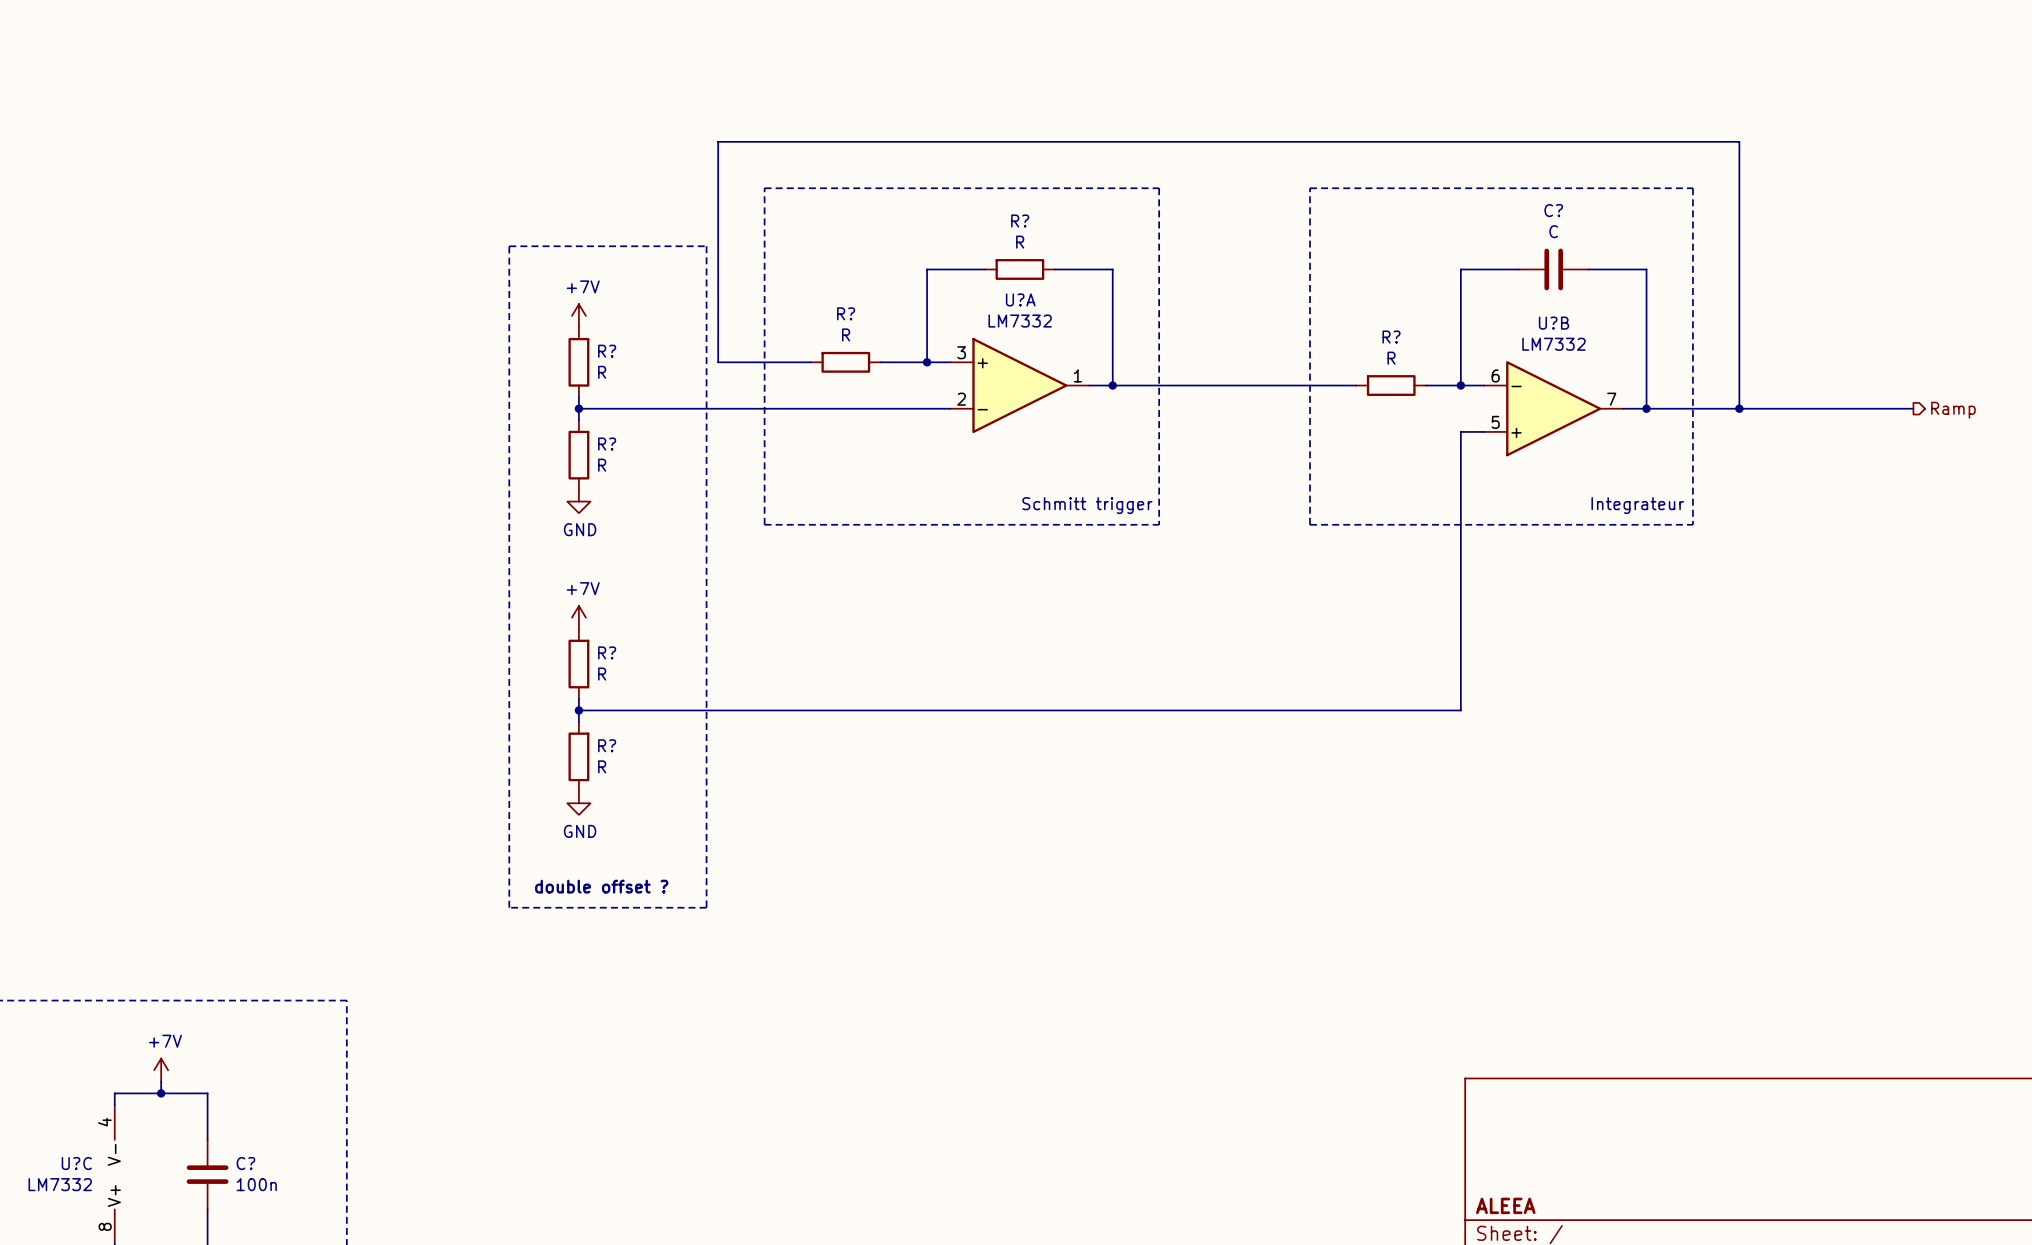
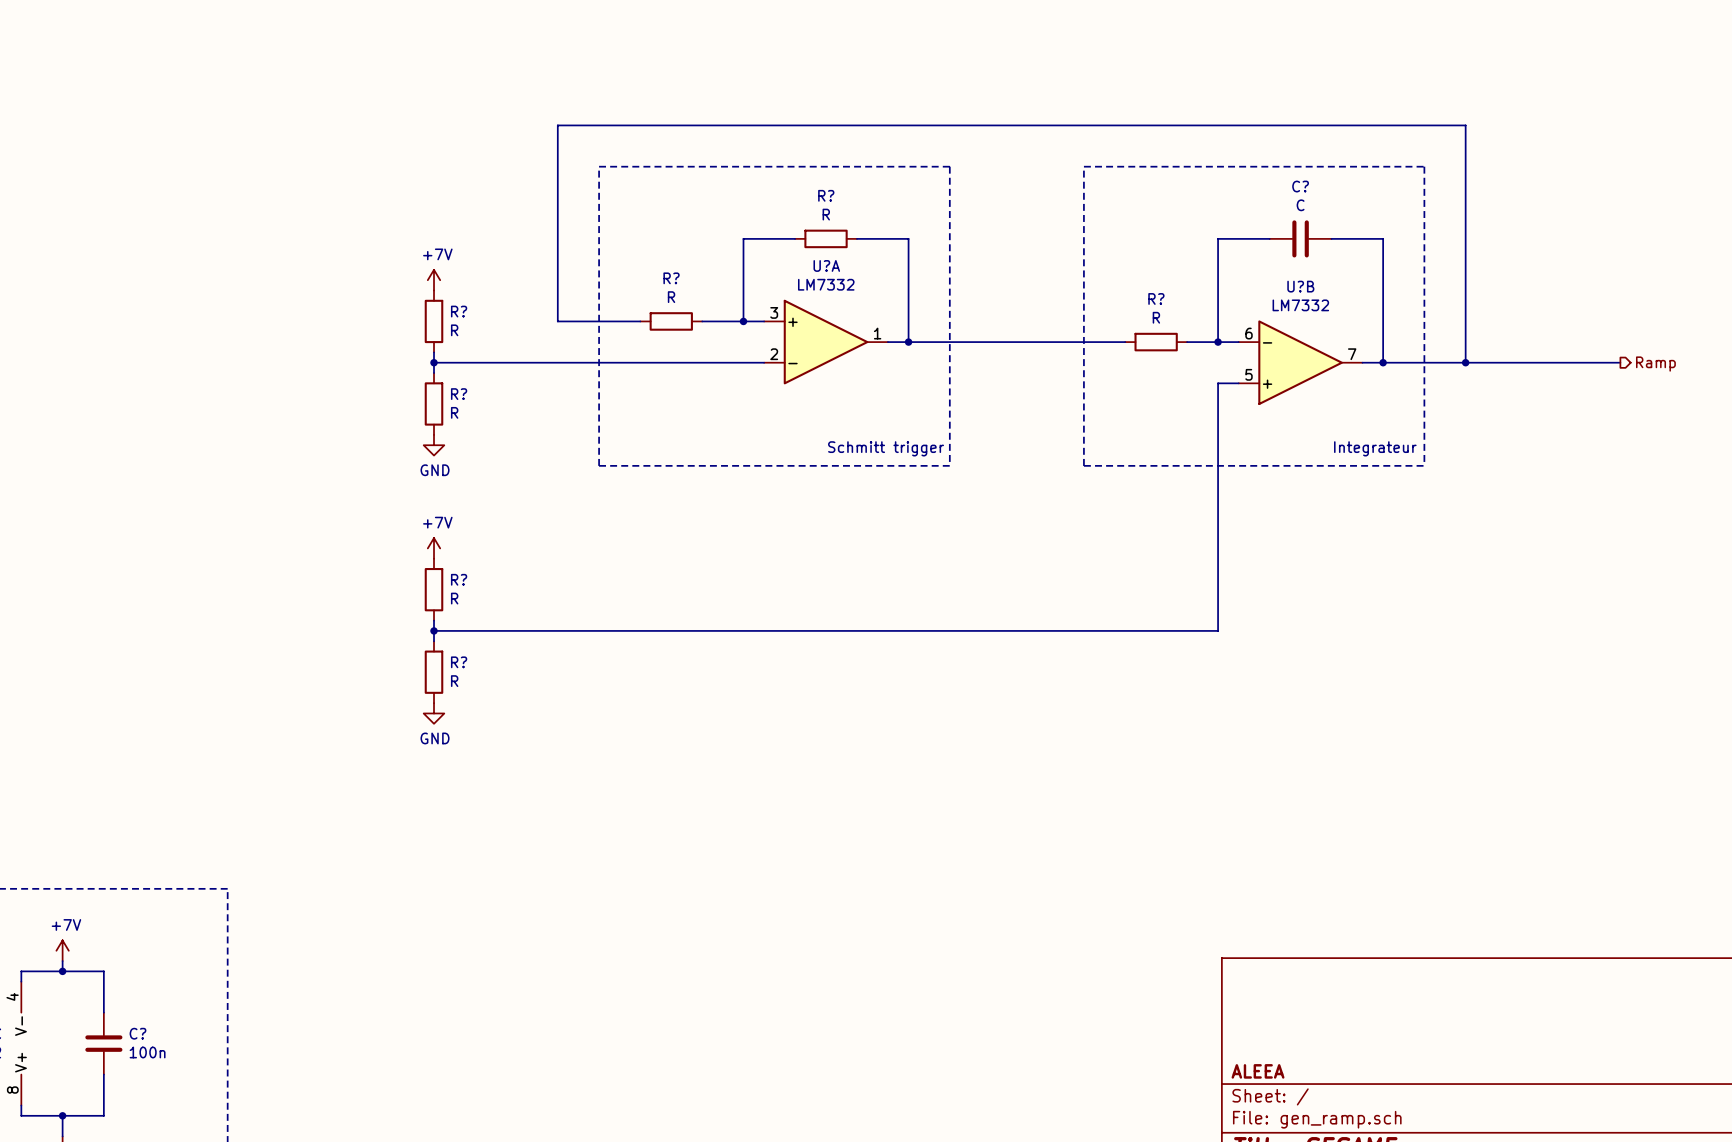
line: (509, 246) (706, 246) (706, 907) (509, 907) (509, 246) -> none
text: double offset ? (601, 886) -> none

